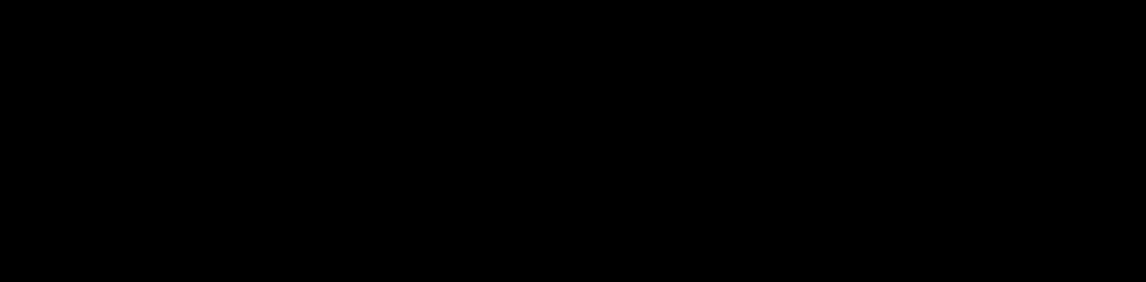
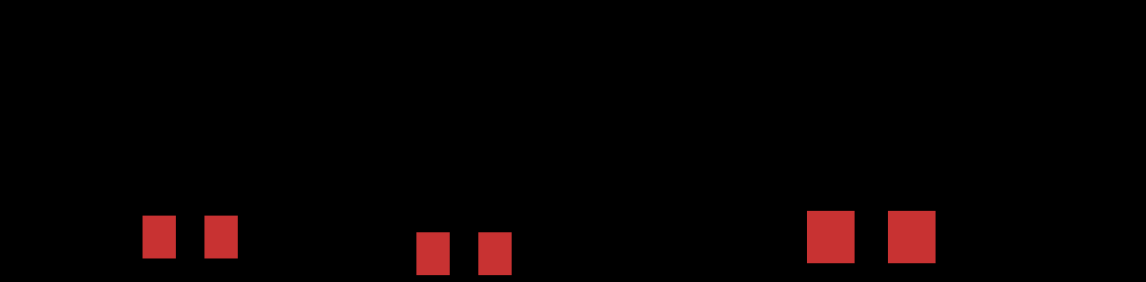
part: none -> (190, 237)
part: none -> (871, 237)
part: none -> (464, 253)

